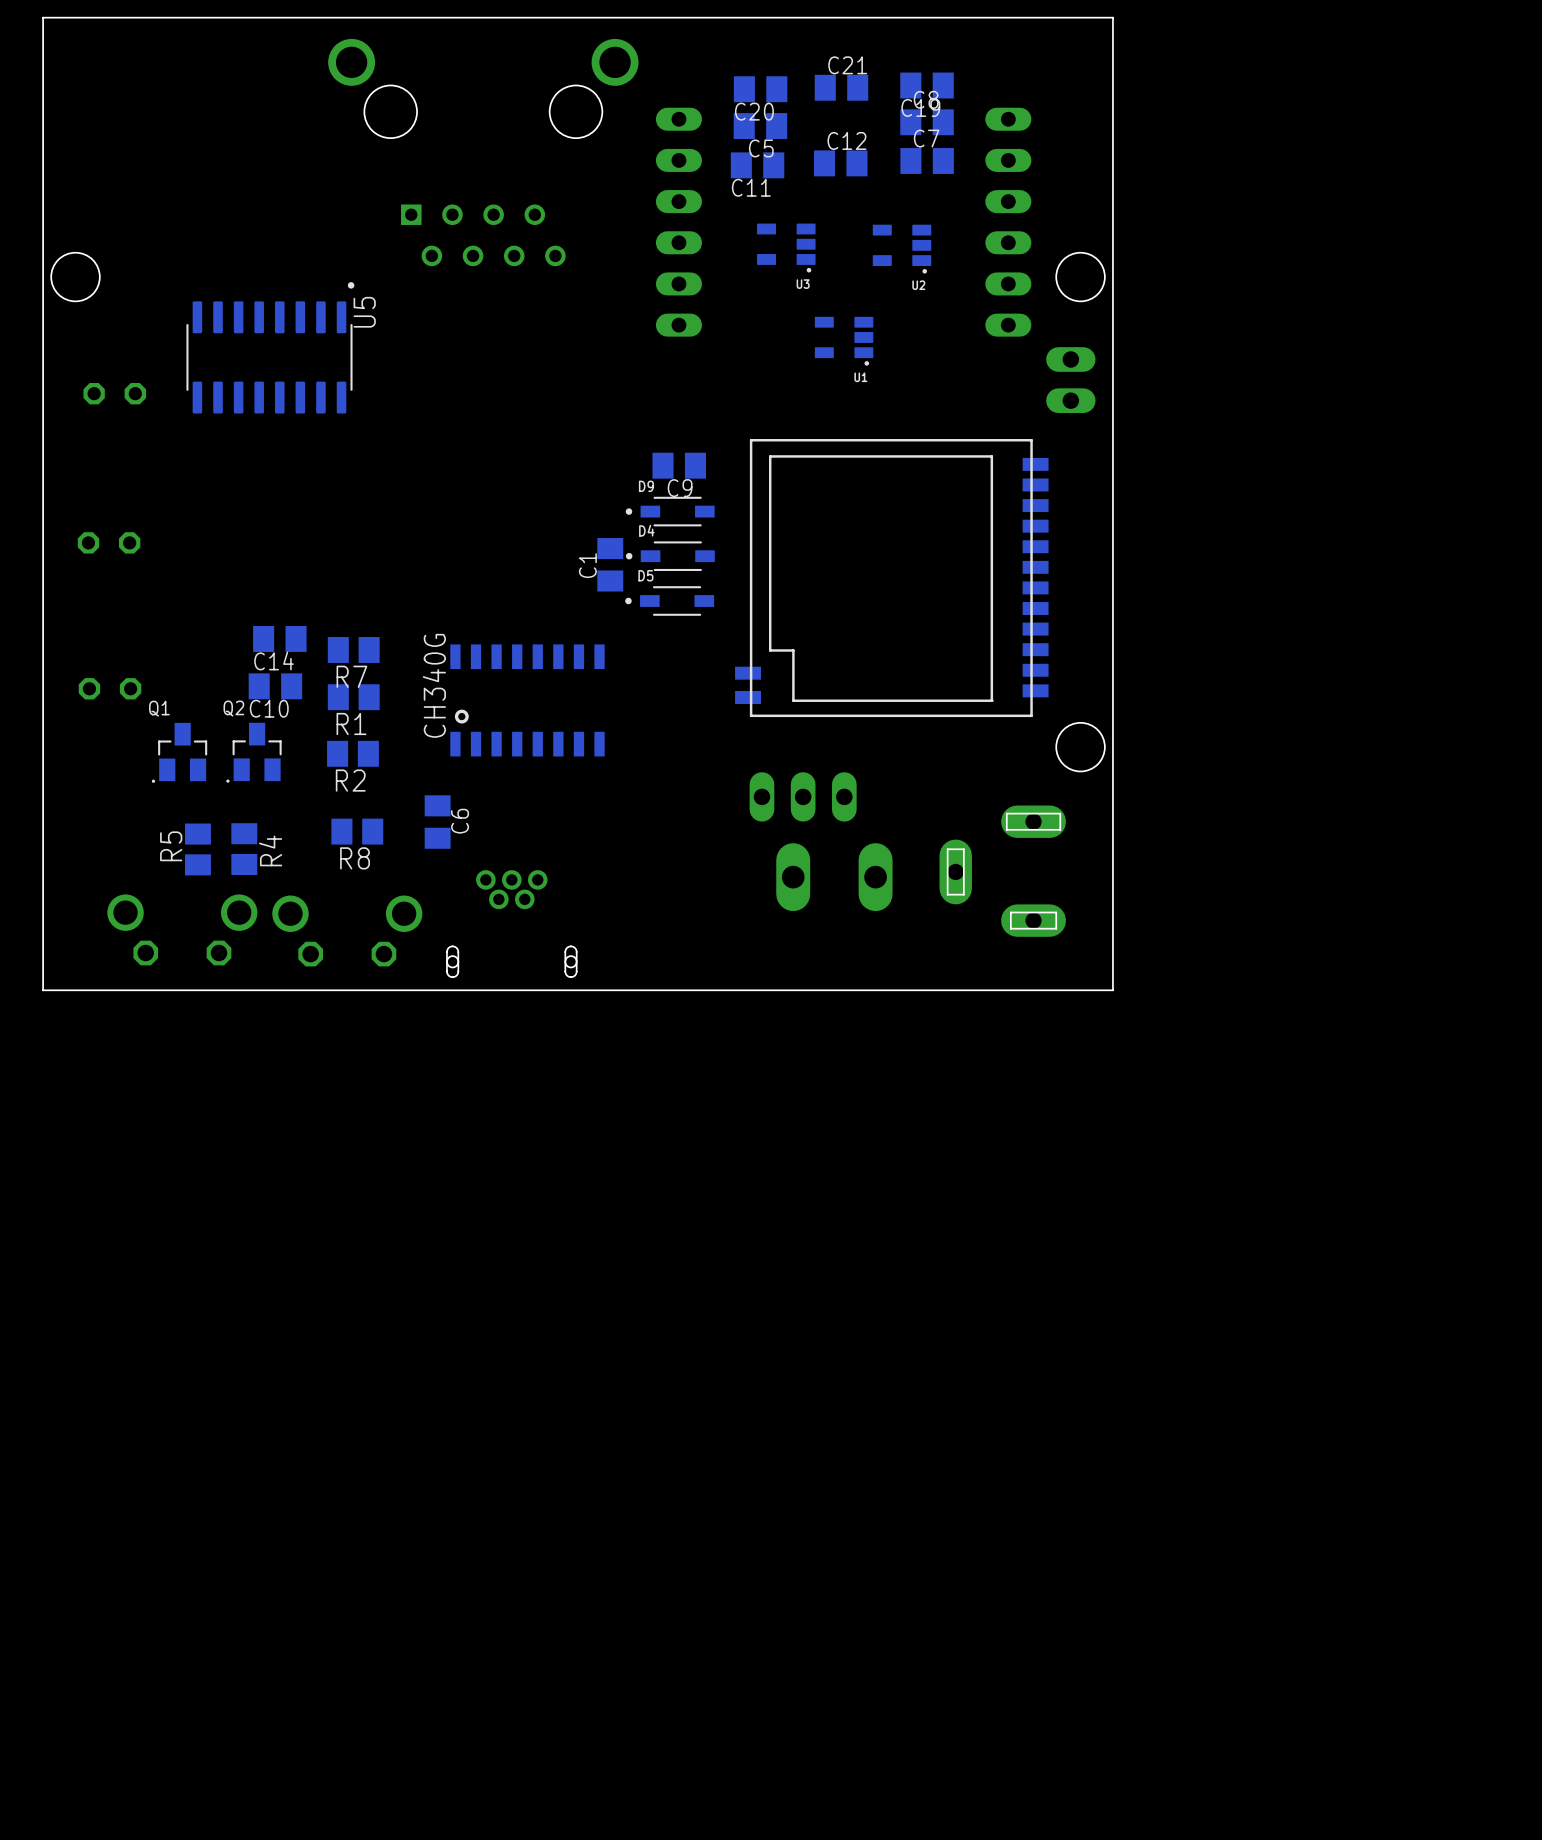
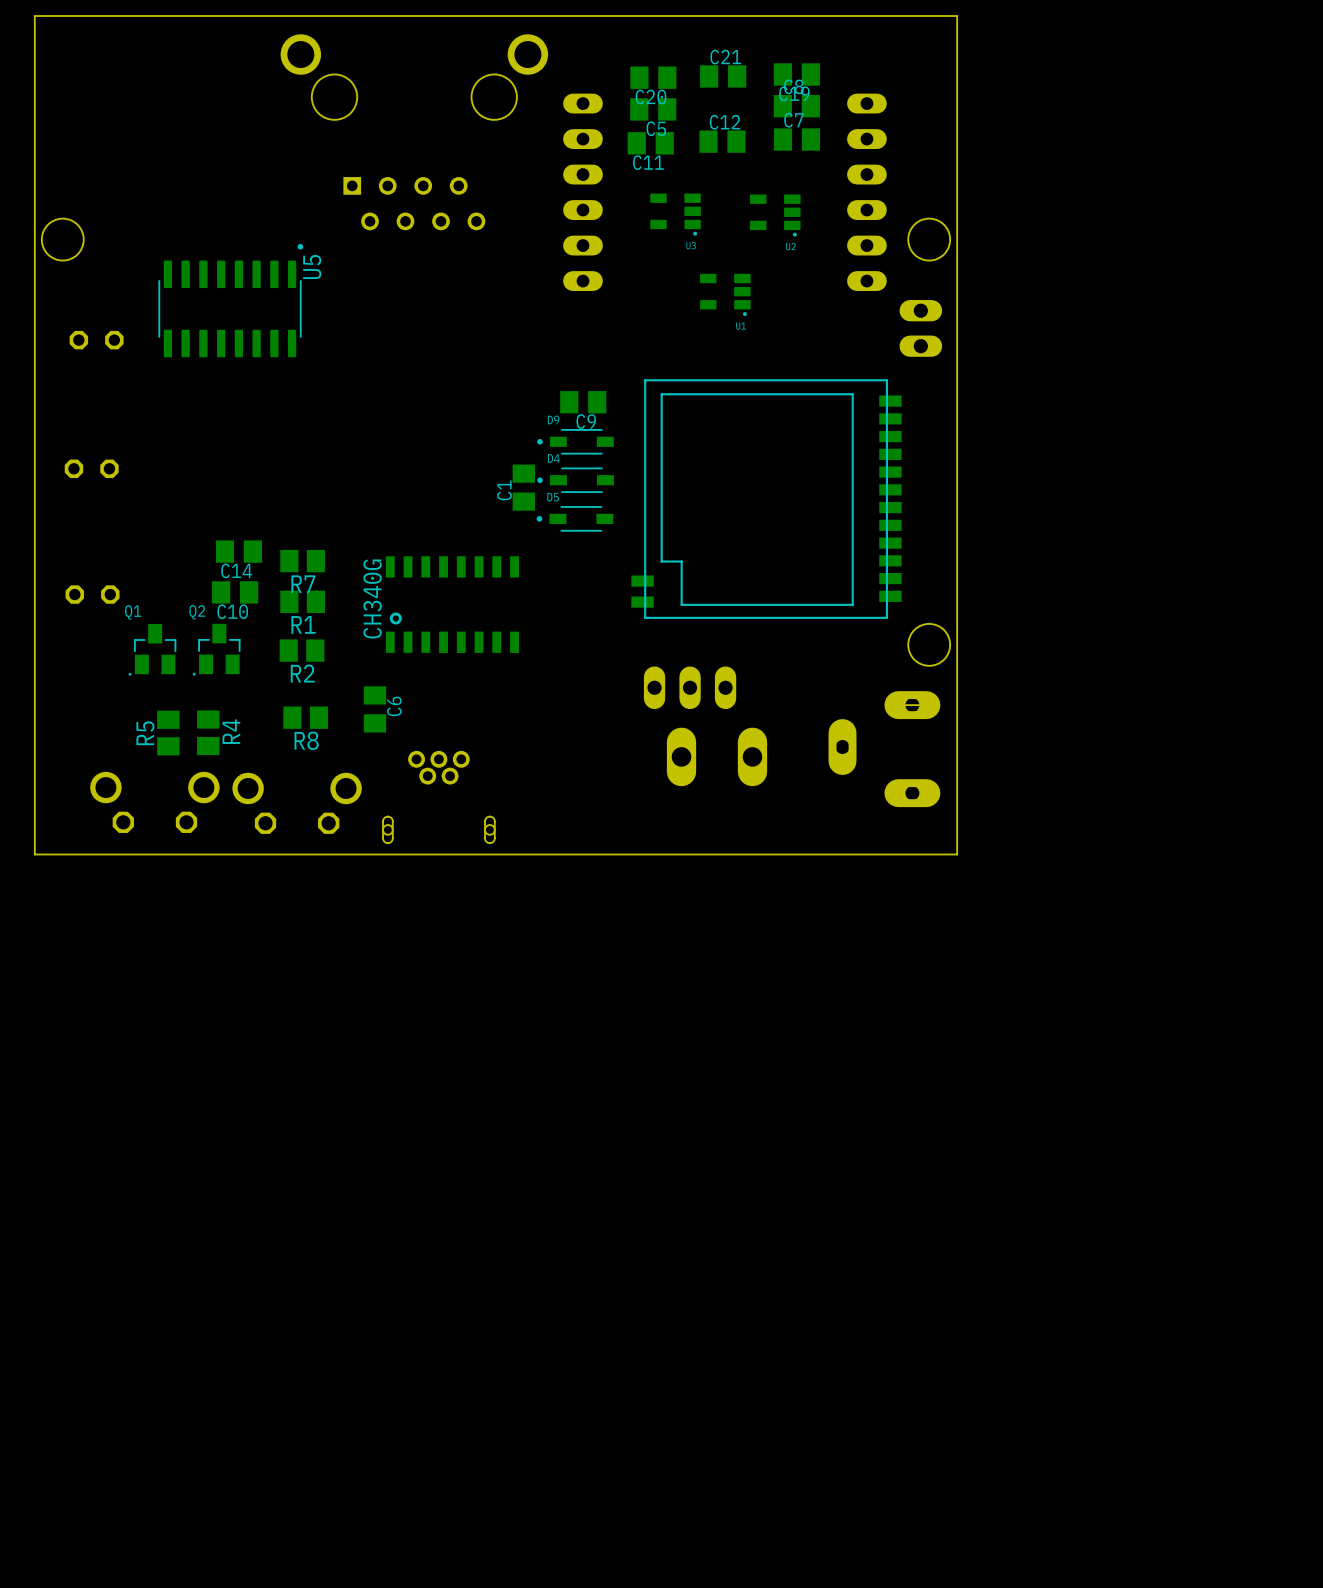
part: none -> (884, 749)
part: (1002, 871) -> none

